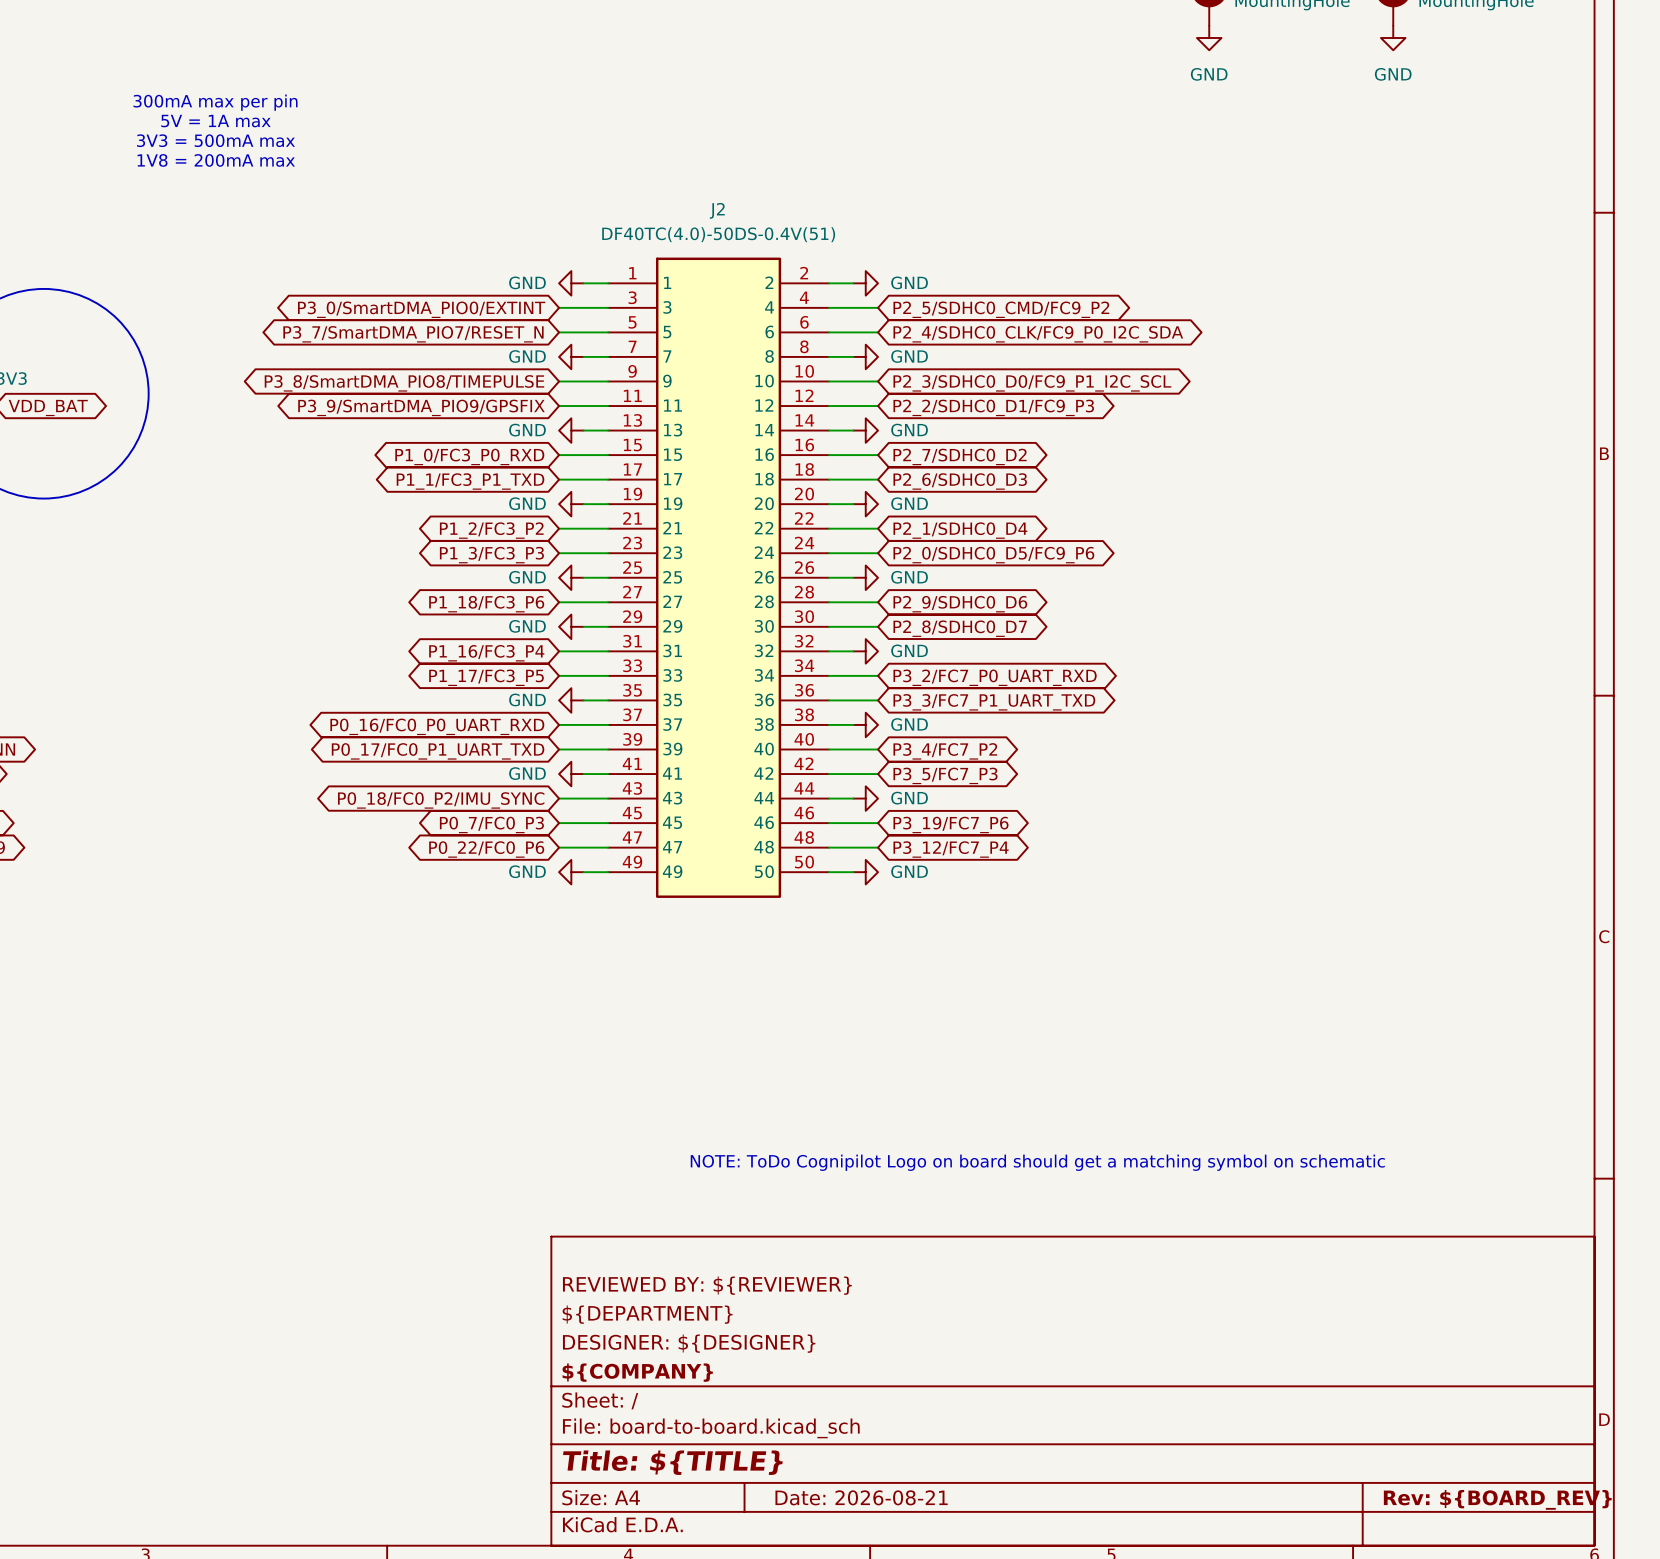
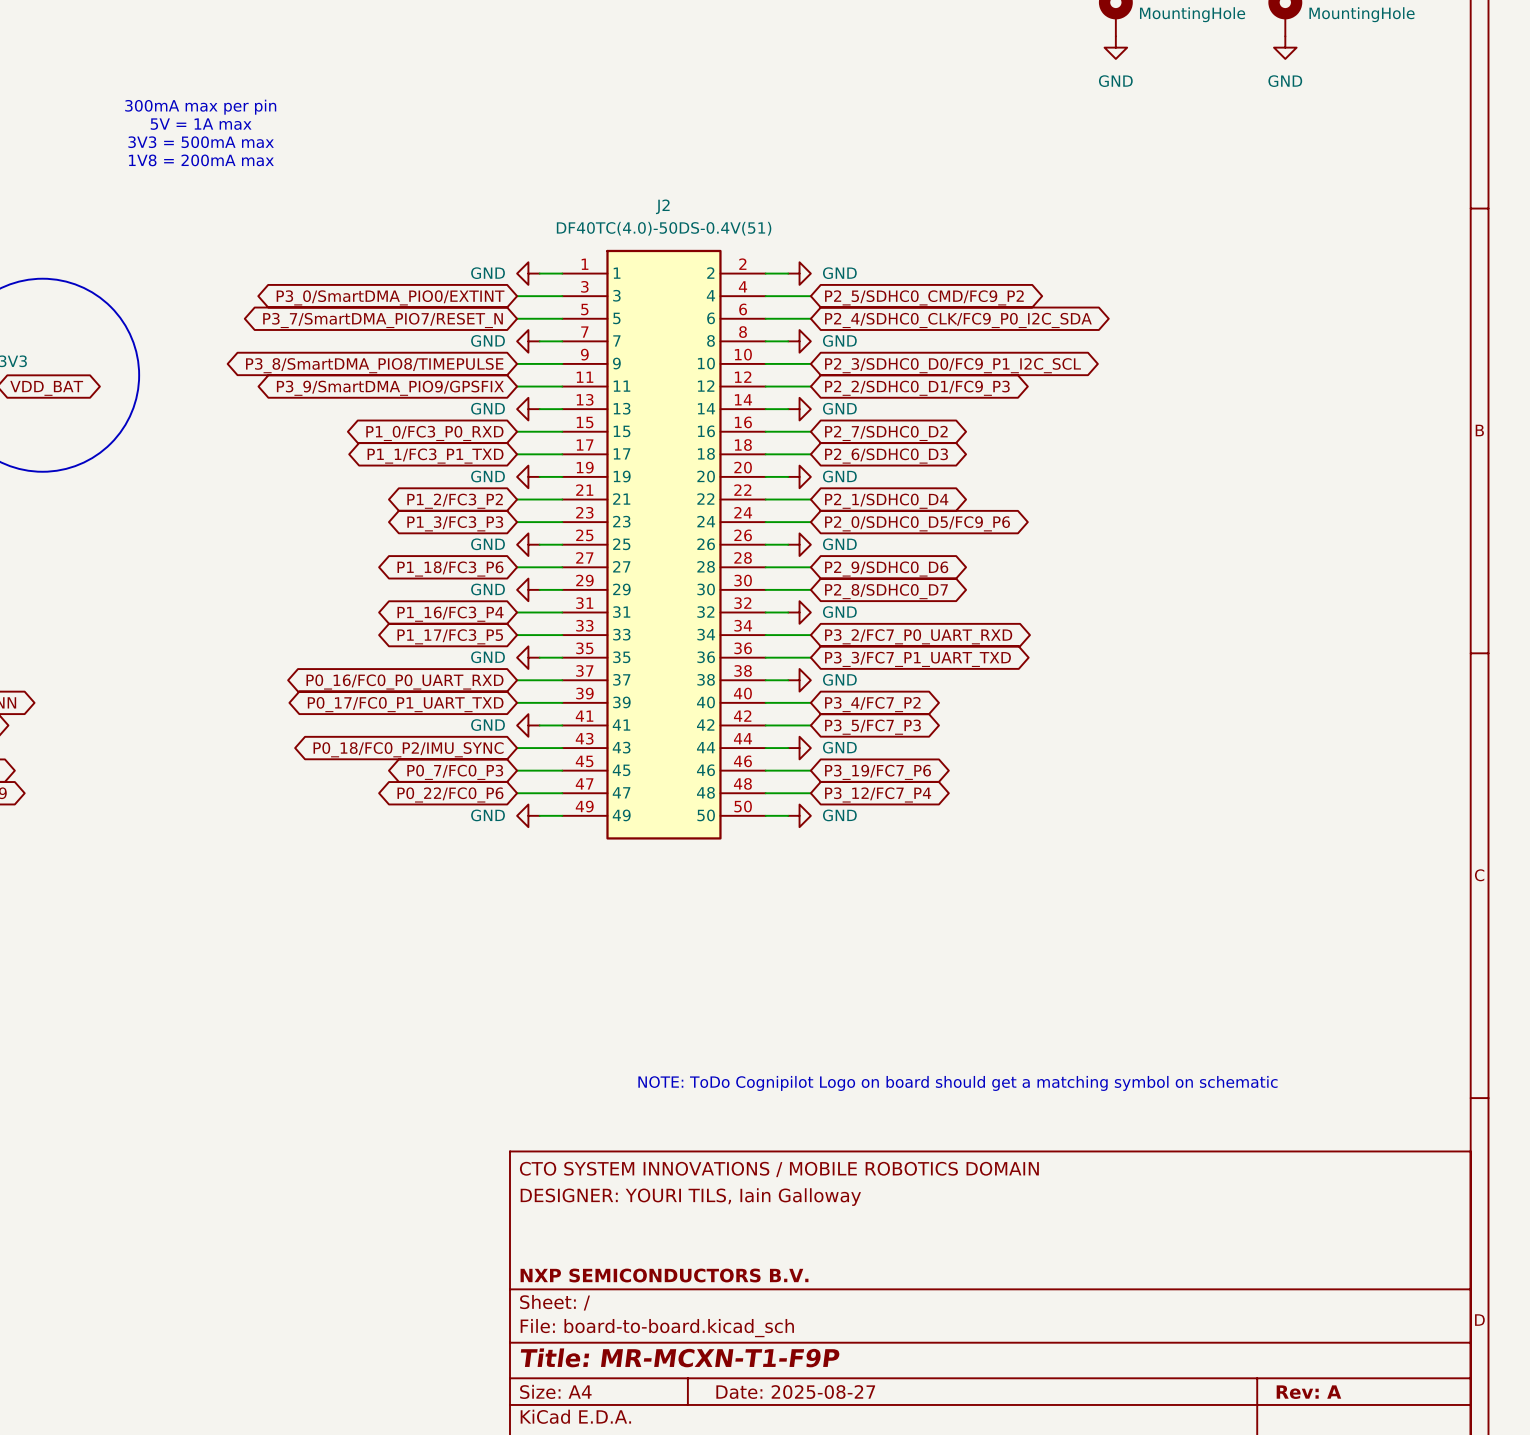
title block: none -> CTO SYSTEM INNOVATIONS / MOBILE ROBOTICS DOMAIN (779, 1169)
title block: REVIEWED BY: ${REVIEWER} (707, 1285) -> DESIGNER: YOURI TILS, Iain Galloway (690, 1197)
title block: ${DEPARTMENT} (647, 1314) -> none
title block: DESIGNER: ${DESIGNER} (689, 1343) -> none
title block: ${COMPANY} (637, 1372) -> NXP SEMICONDUCTORS B.V. (664, 1275)
title block: Title: ${TITLE} (672, 1462) -> Title: MR-MCXN-T1-F9P (680, 1357)
title block: Date: 2026-08-21 (861, 1497) -> Date: 2025-08-27 (795, 1392)
title block: Rev: ${BOARD_REV} (1497, 1499) -> Rev: A (1308, 1392)

